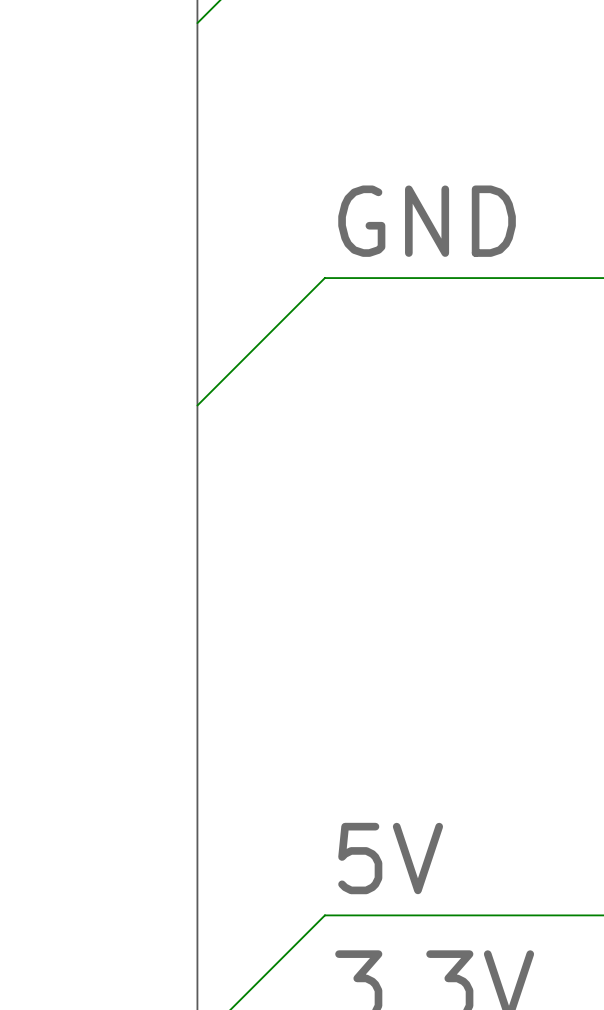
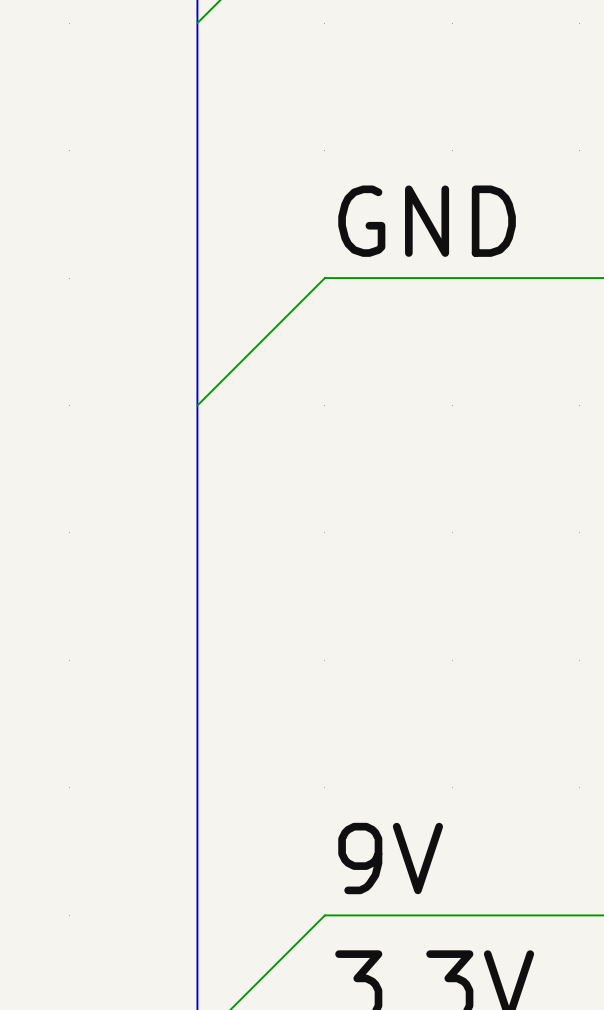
label: 5V (390, 858) -> 9V (390, 858)

